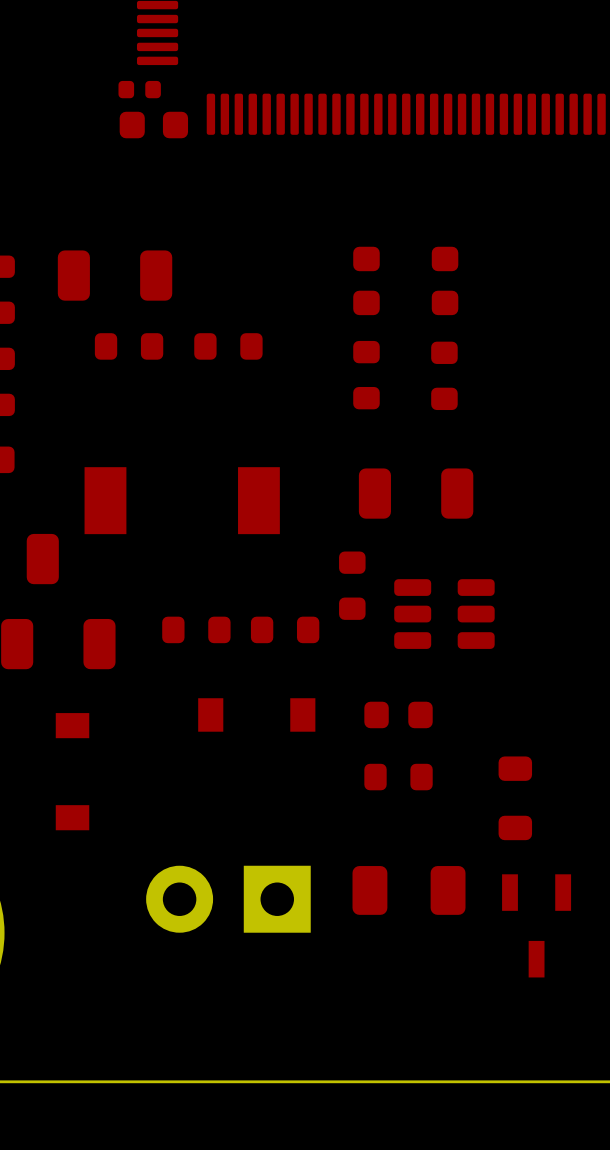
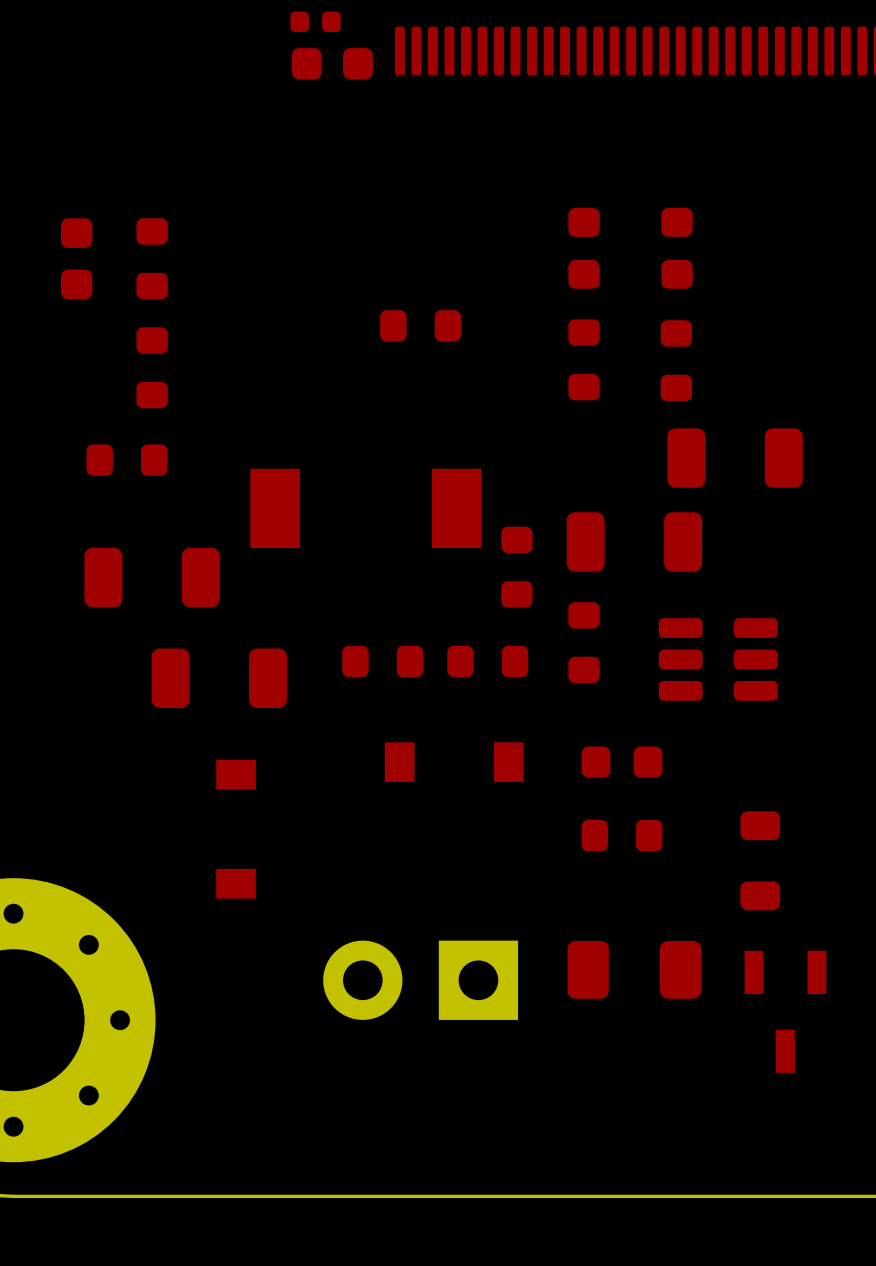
part: (115, 275) -> none
part: (129, 346) -> none
part: none -> (735, 458)
part position: (416, 493) -> (634, 541)
part: none -> (516, 567)
part: (352, 585) -> none
part: none -> (584, 642)
part position: (444, 614) -> (718, 659)

